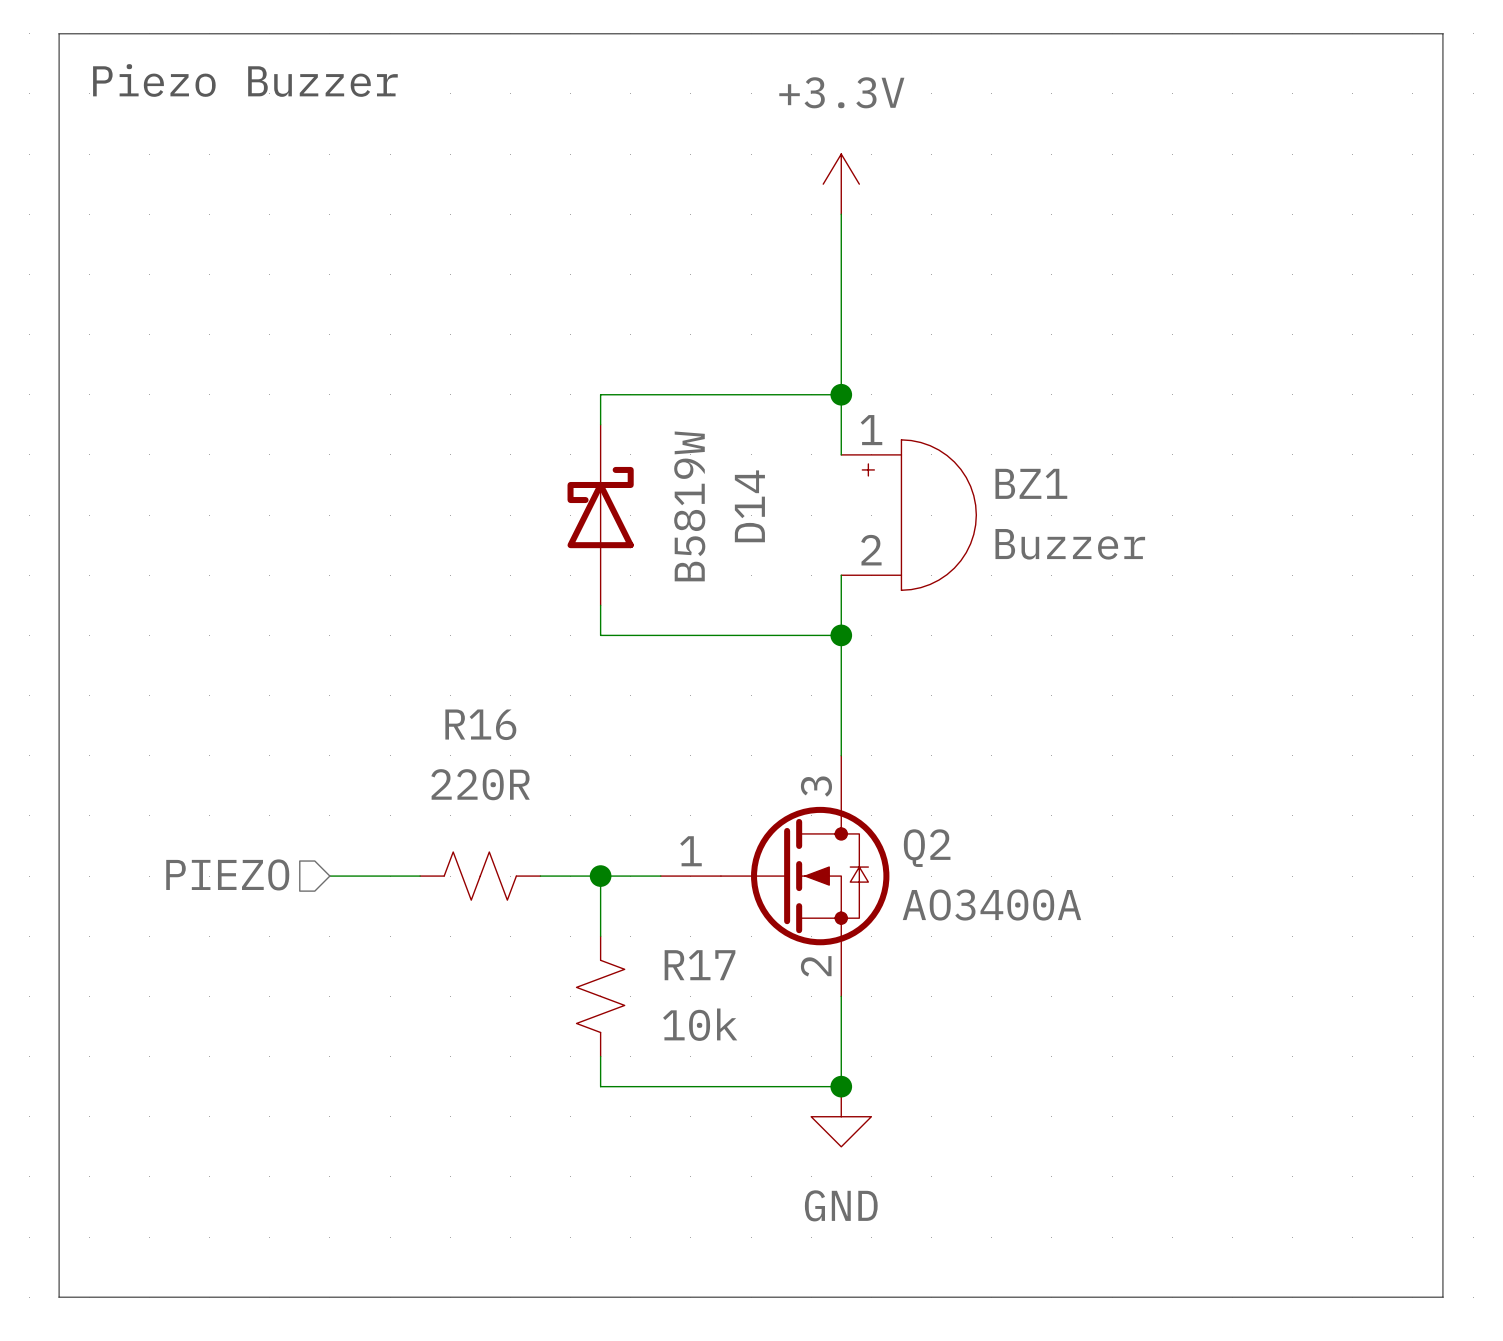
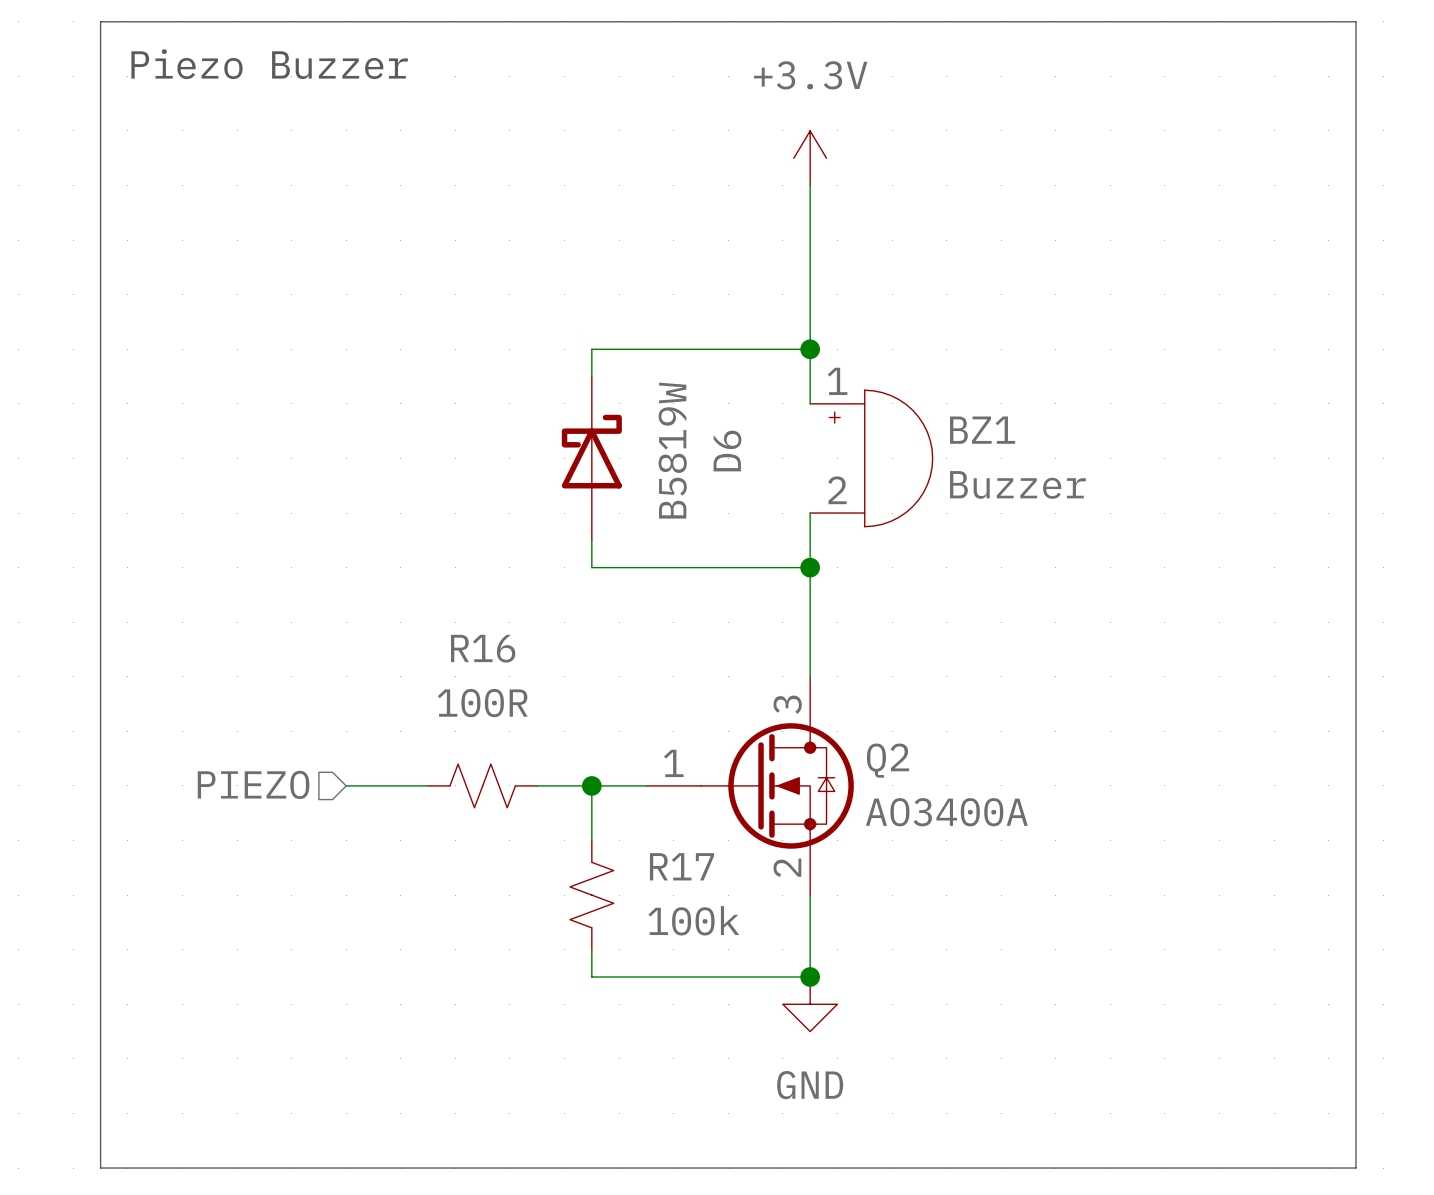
D14 name: D14 (749, 506) -> D6 (727, 451)
R16 value: 220R (480, 784) -> 100R (482, 703)
R17 value: 10k (700, 1024) -> 100k (693, 920)

